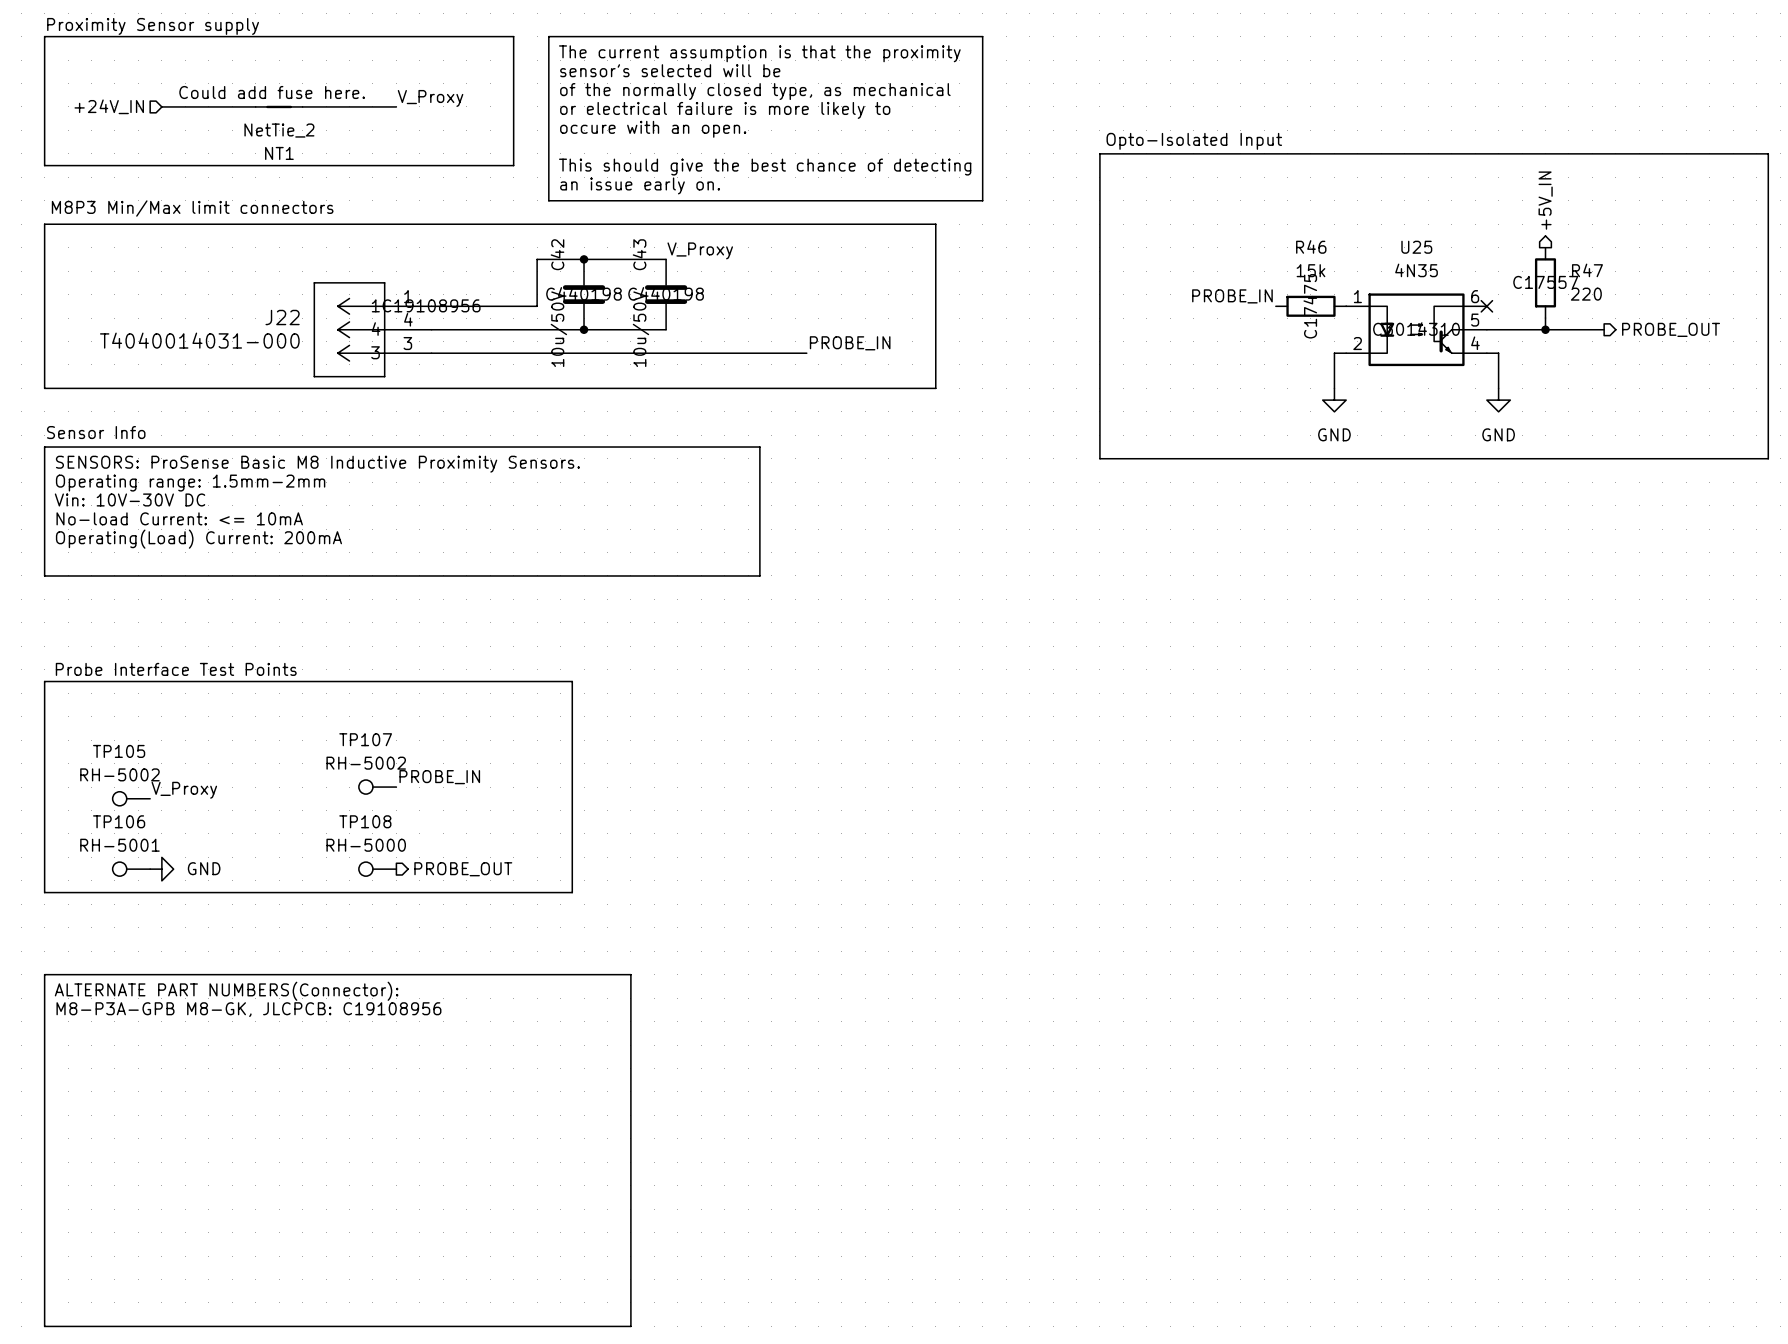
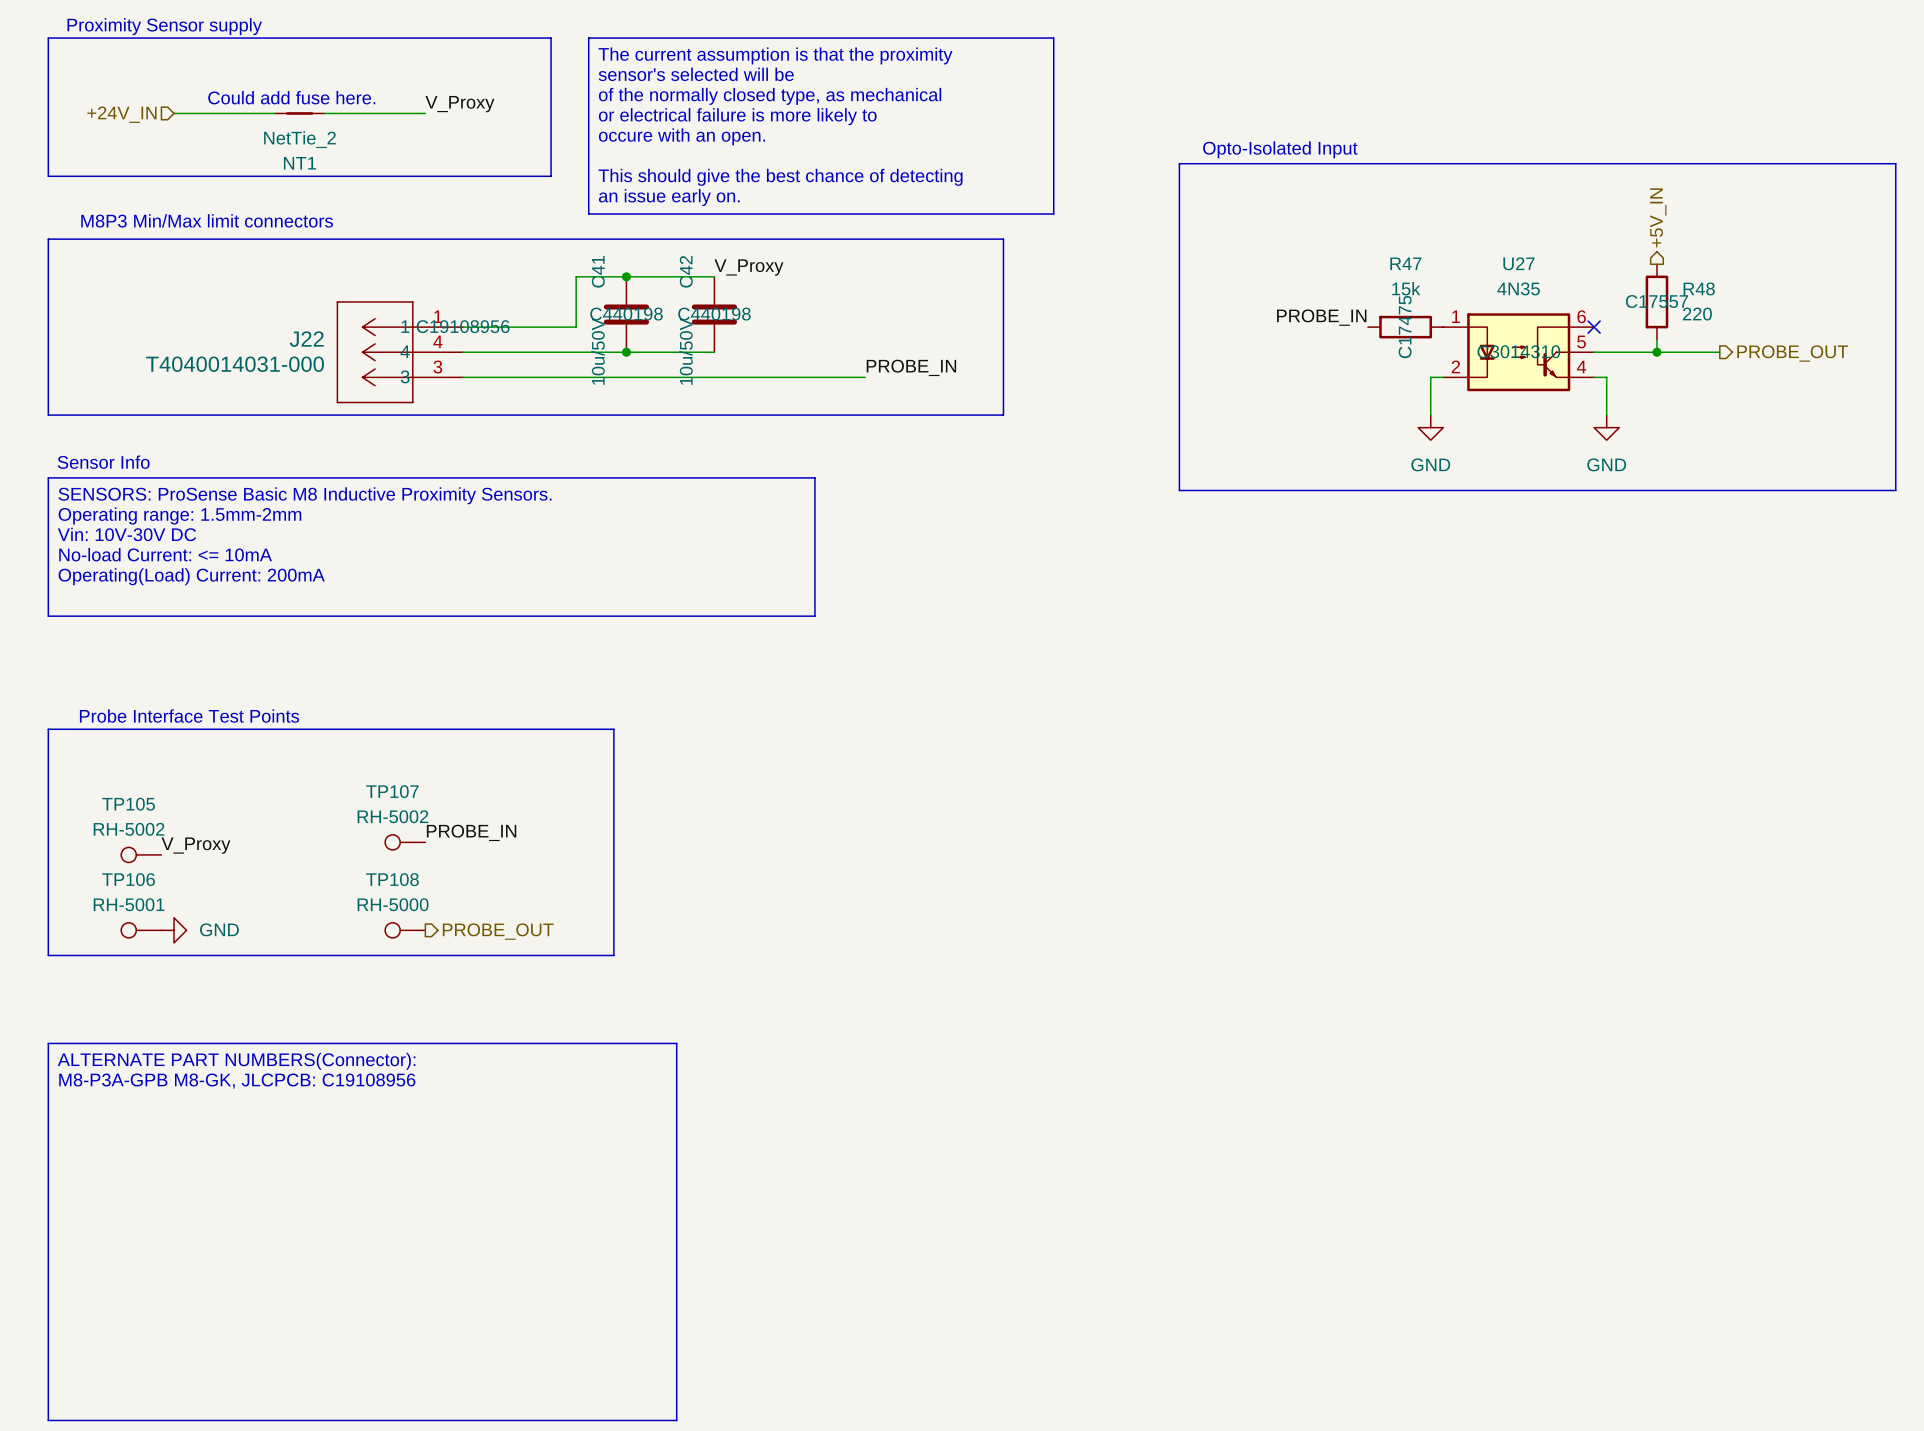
R46 name: R46 (1311, 246) -> R47 (1405, 263)
U25 name: U25 (1416, 247) -> U27 (1518, 263)
C42 name: C42 (557, 254) -> C41 (598, 271)
C43 name: C43 (639, 254) -> C42 (686, 271)
R47 name: R47 (1587, 270) -> R48 (1699, 288)

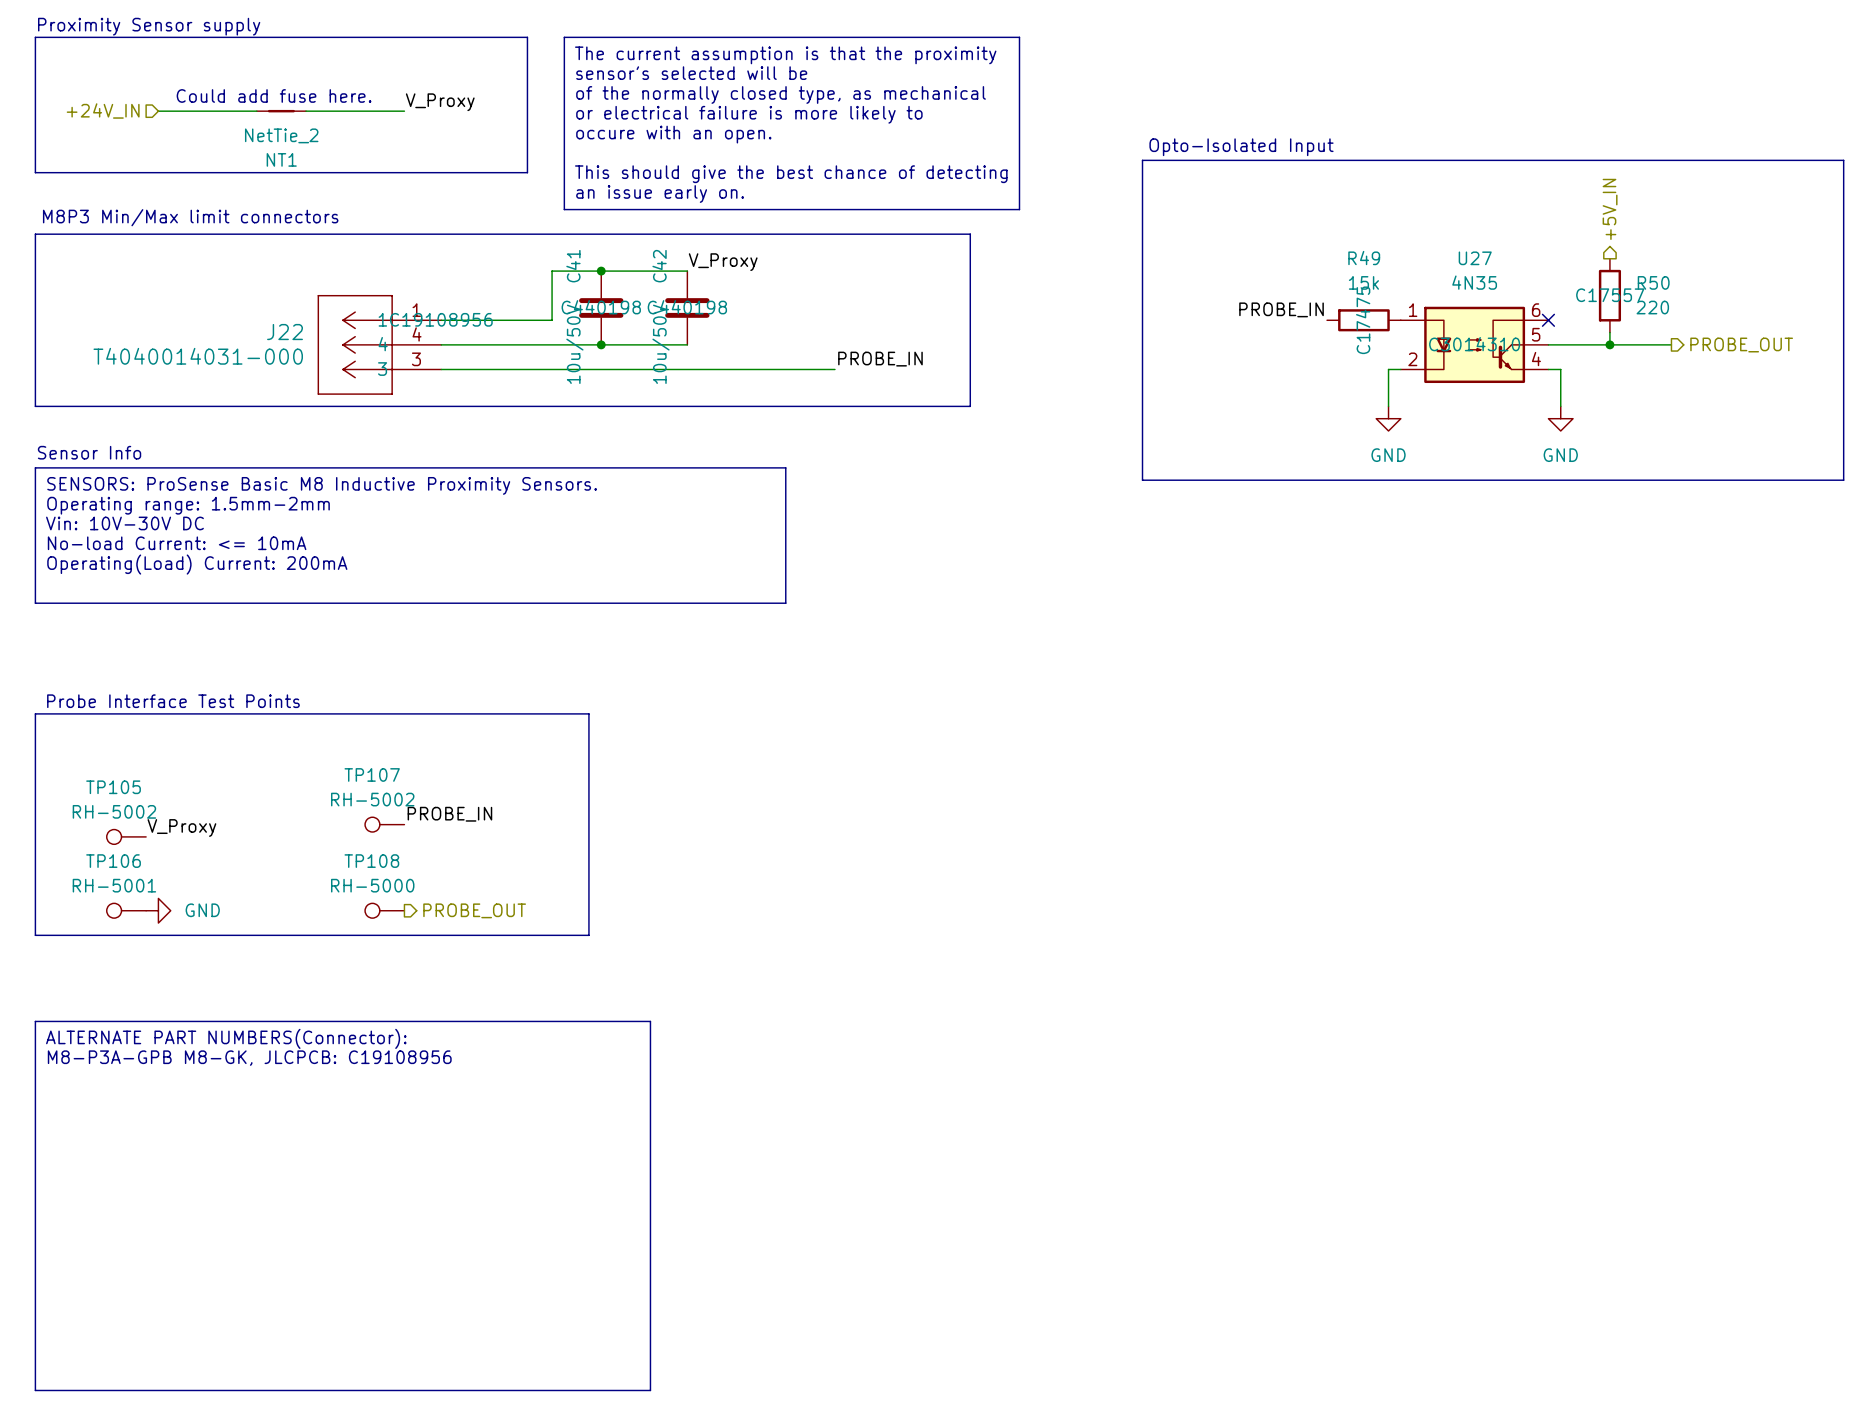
R47 name: R47 (1405, 263) -> R49 (1364, 258)
R48 name: R48 (1699, 288) -> R50 (1653, 282)

